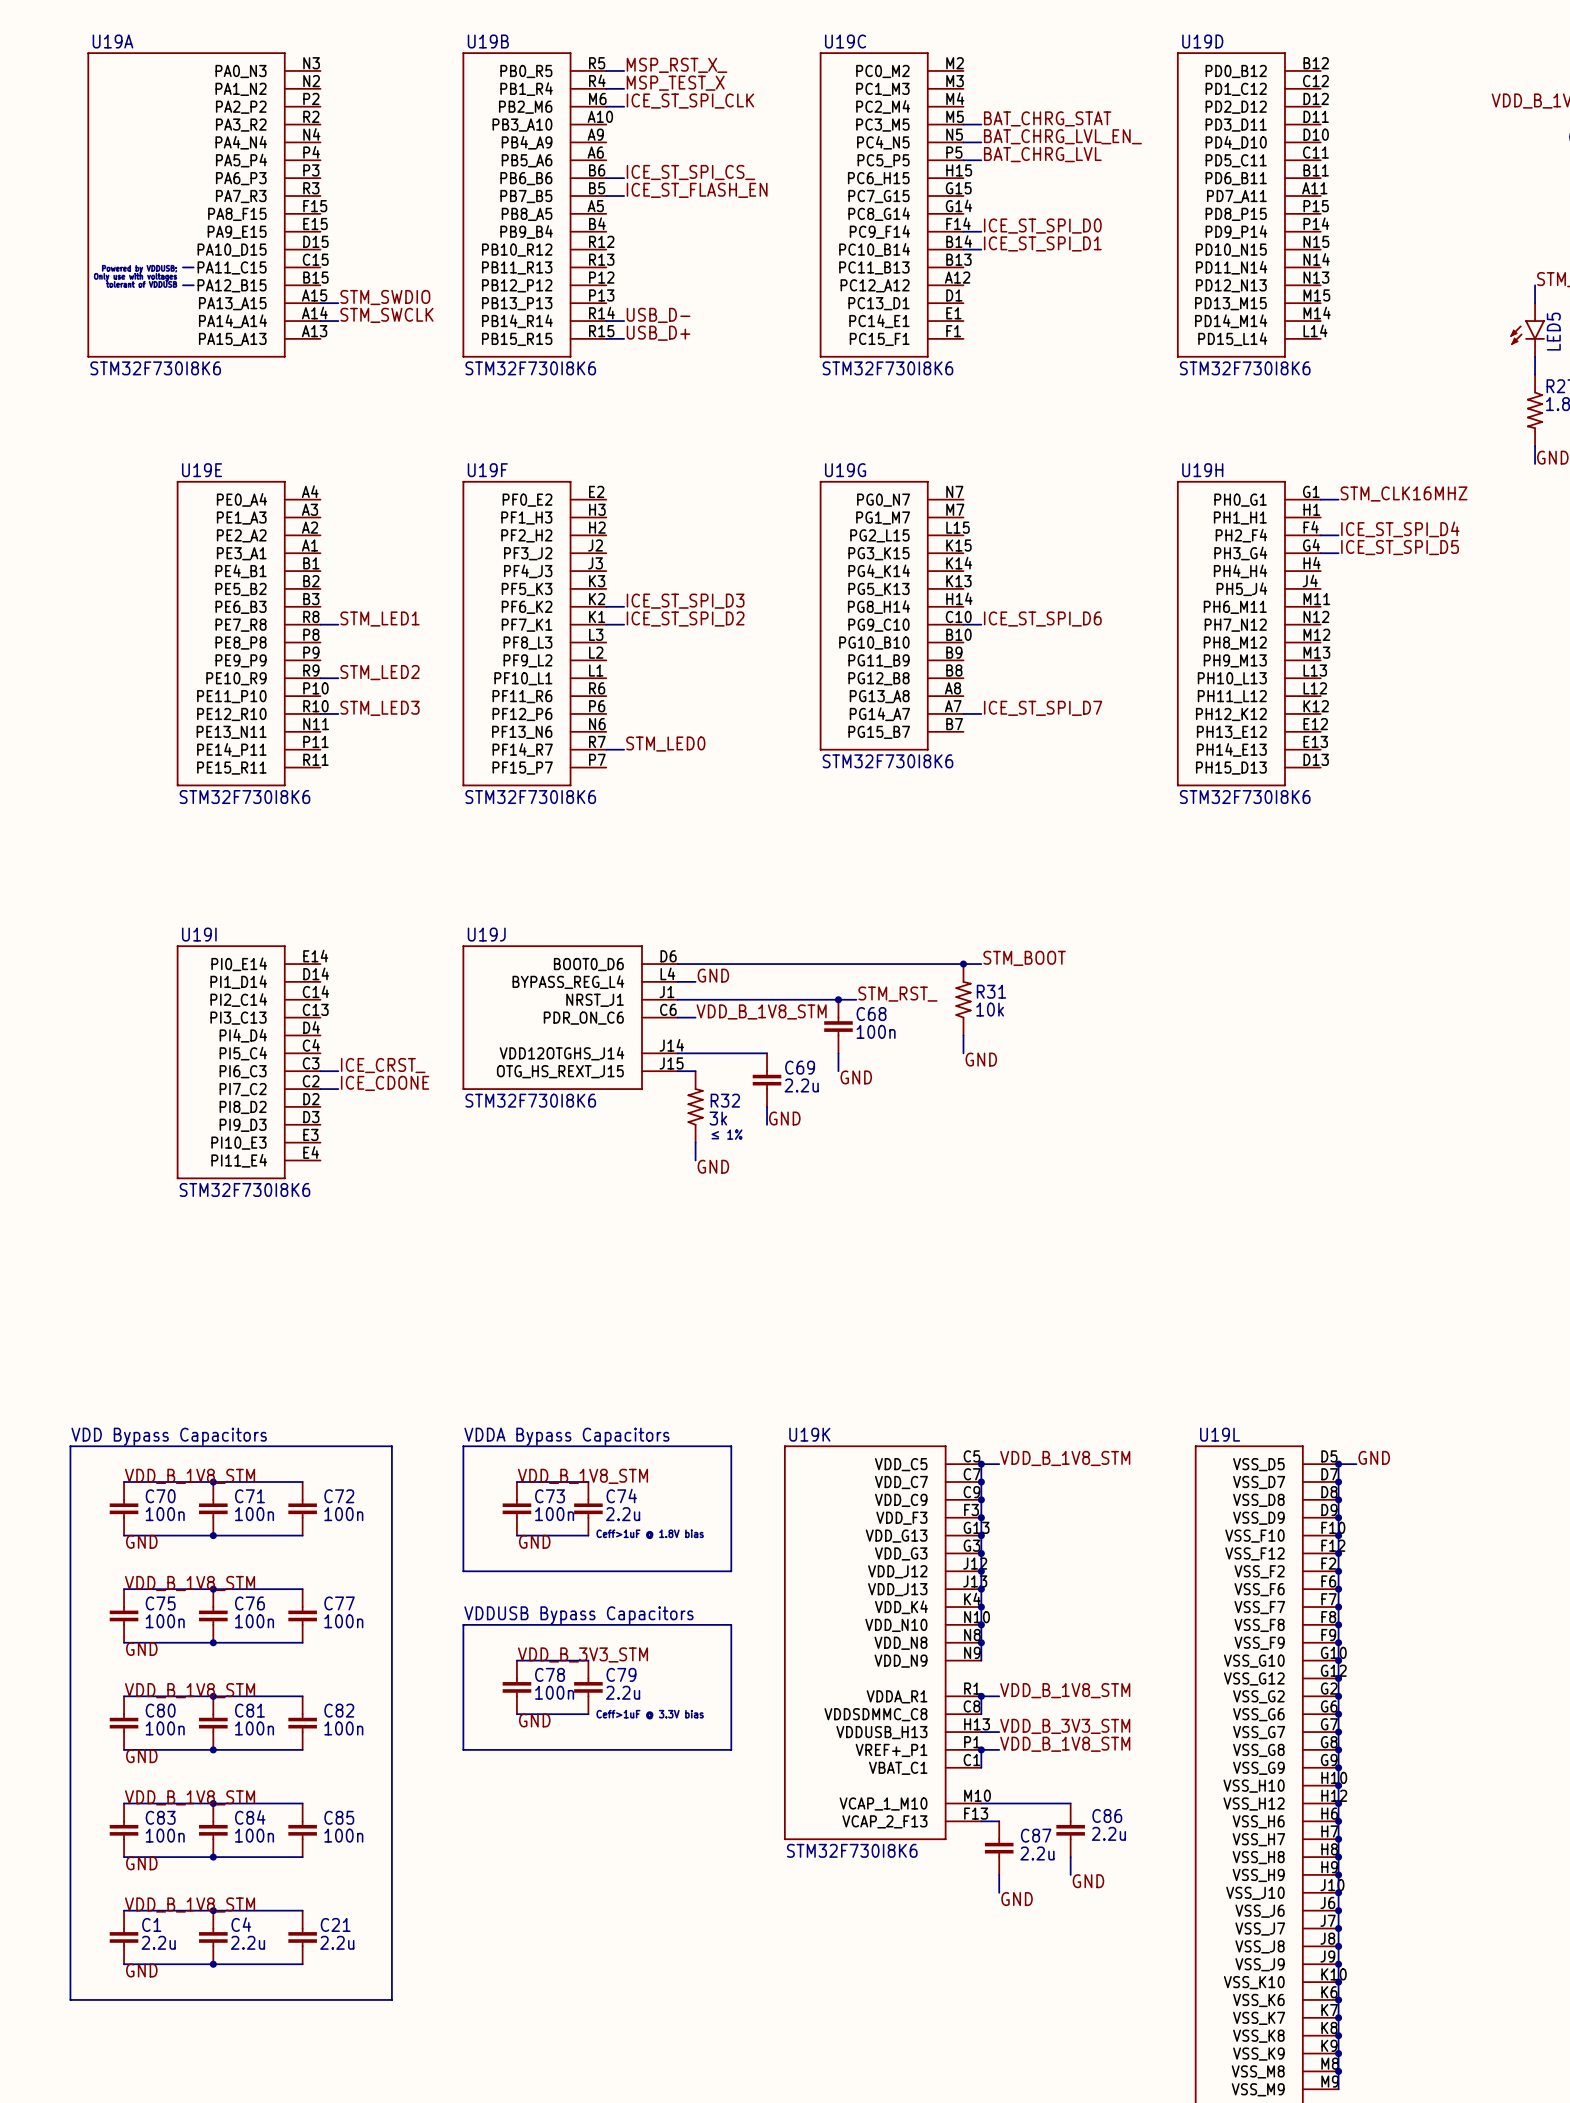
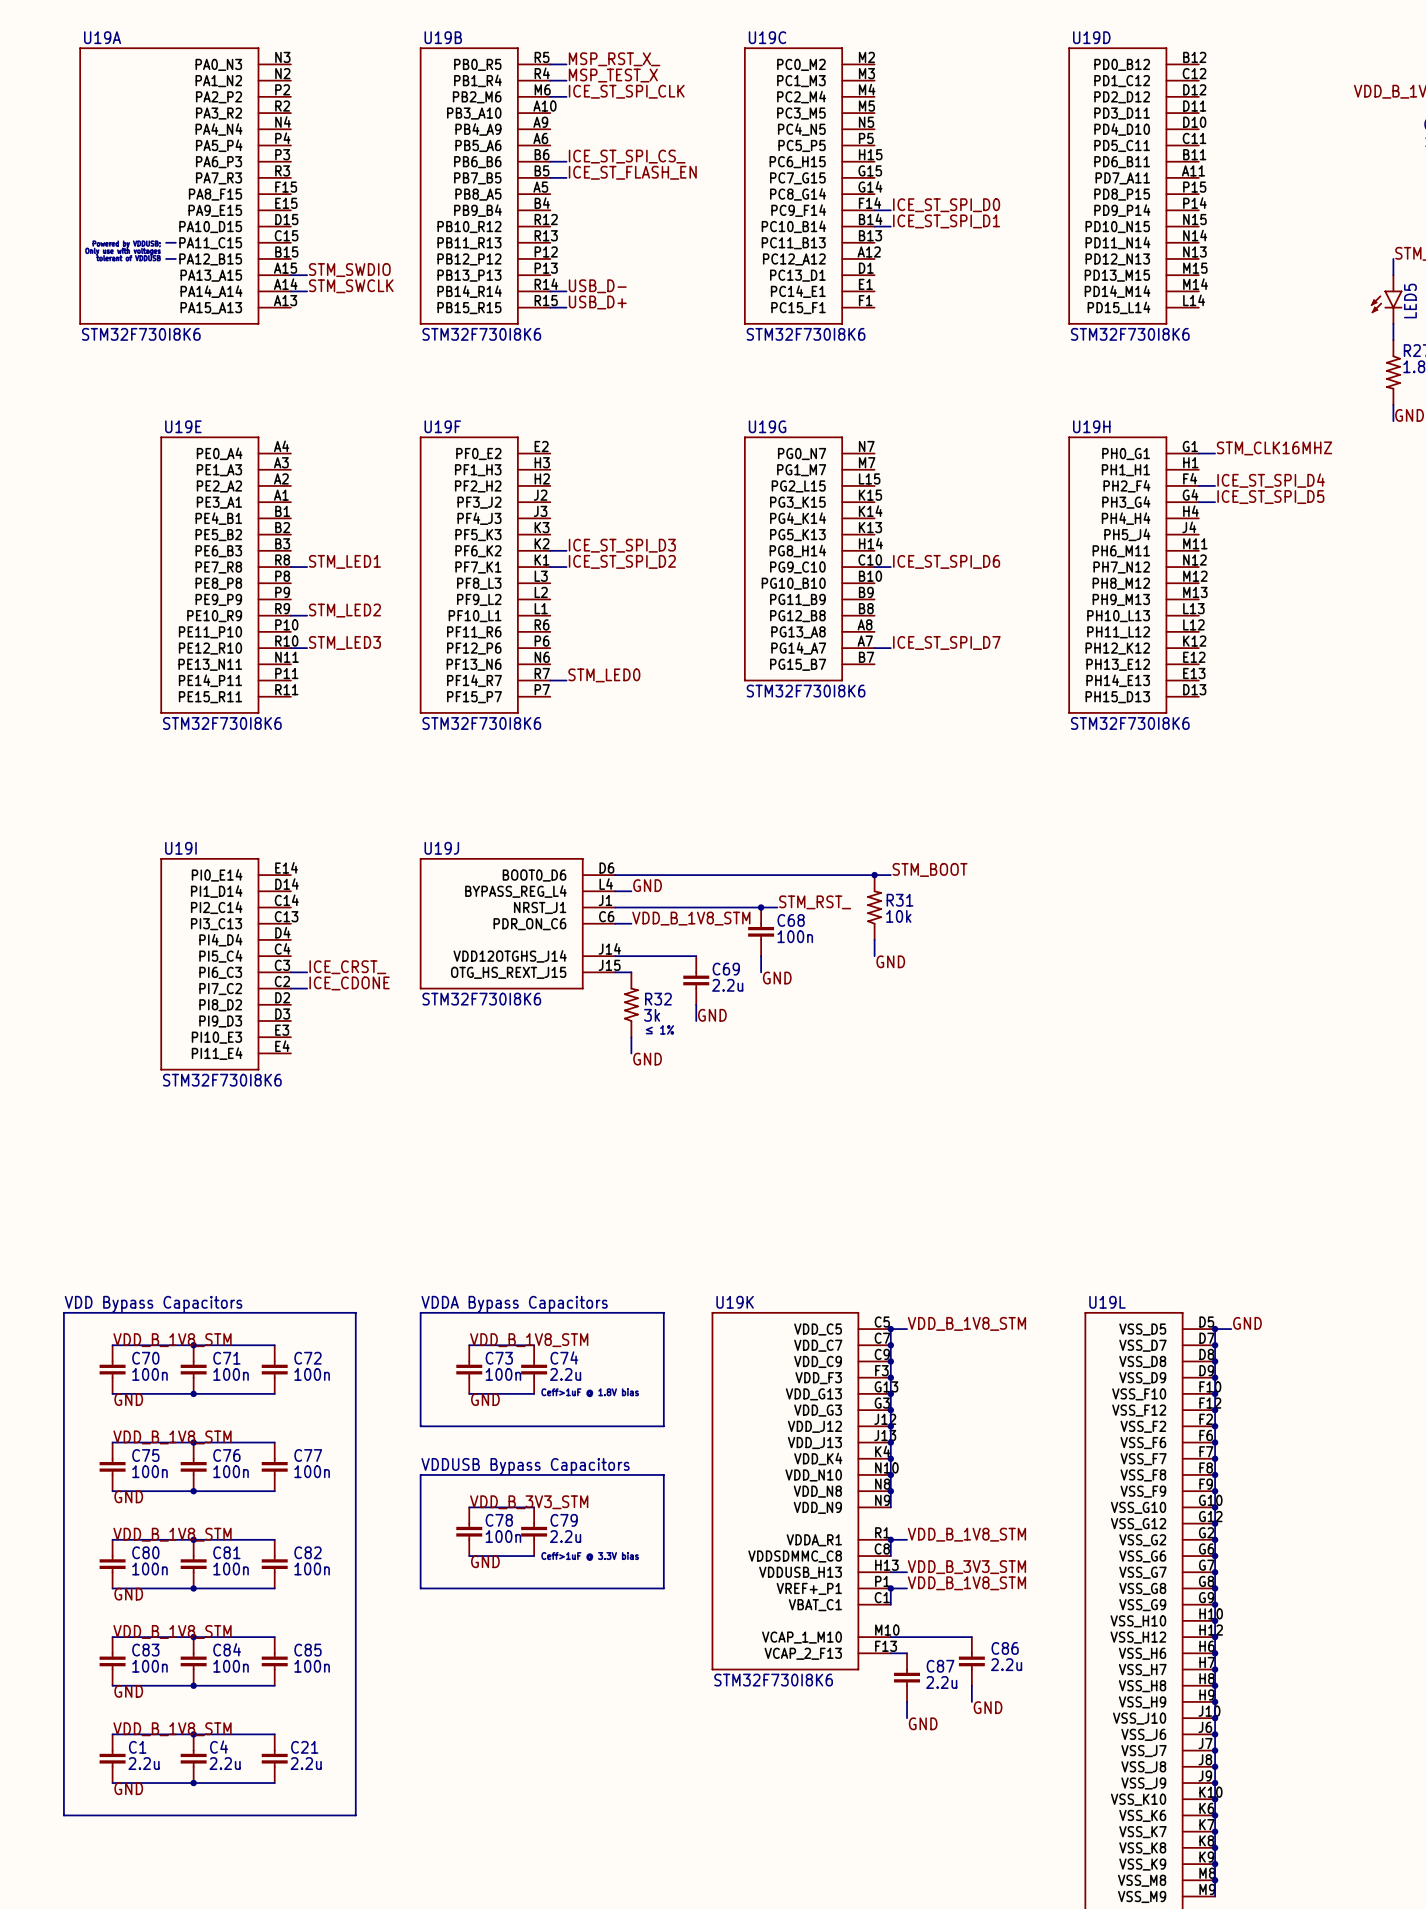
label: BAT_CHRG_STAT (1047, 118) -> none
wire: (963, 124) (981, 124) -> none
label: BAT_CHRG_LVL_EN_ (1062, 136) -> none
wire: (963, 142) (981, 142) -> none
label: BAT_CHRG_LVL (1042, 154) -> none
wire: (963, 160) (981, 160) -> none

